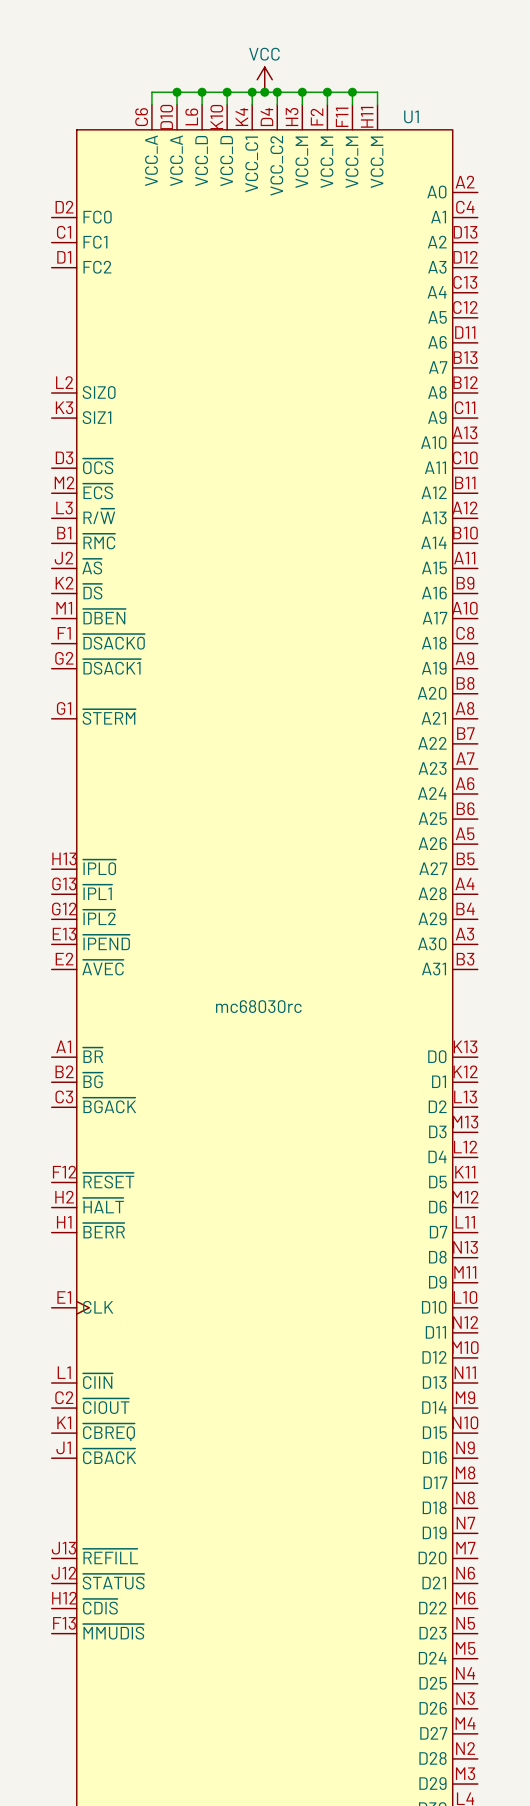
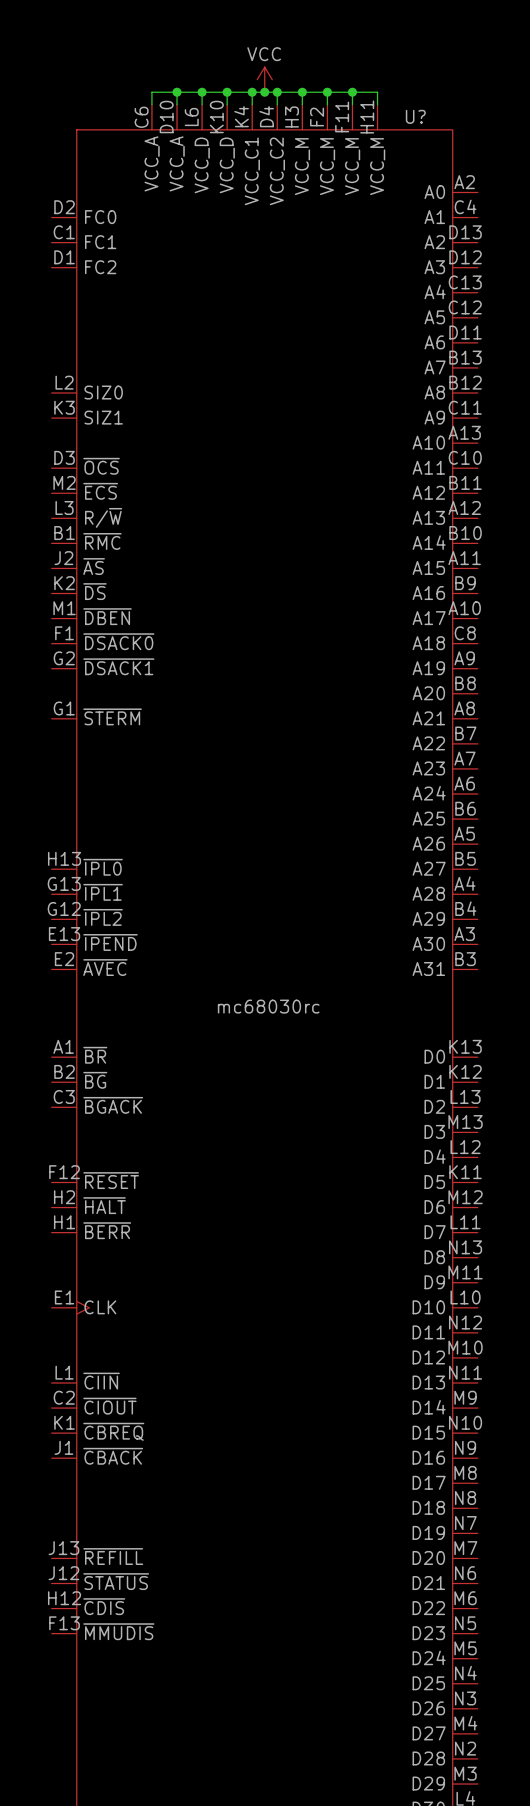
U1 name: U1 (411, 116) -> U? (415, 116)

